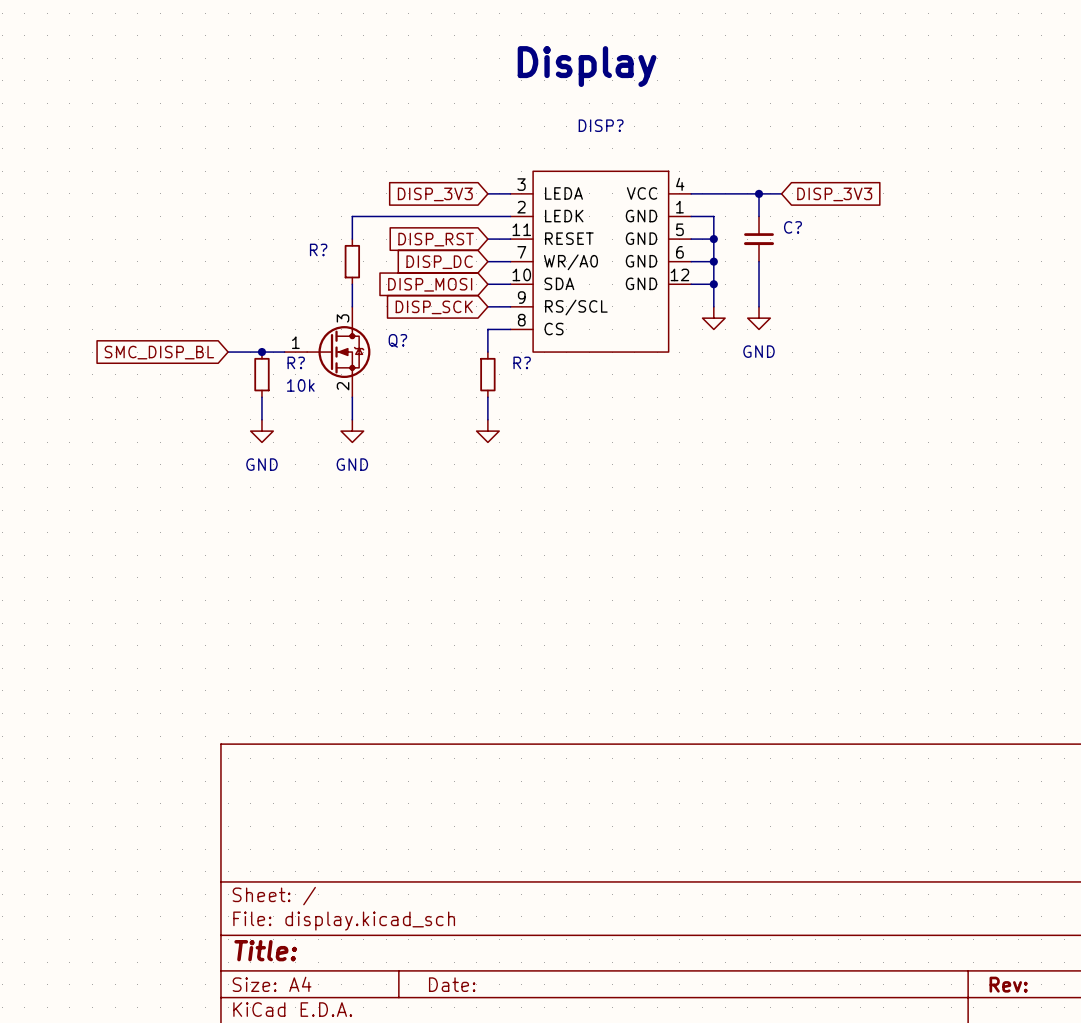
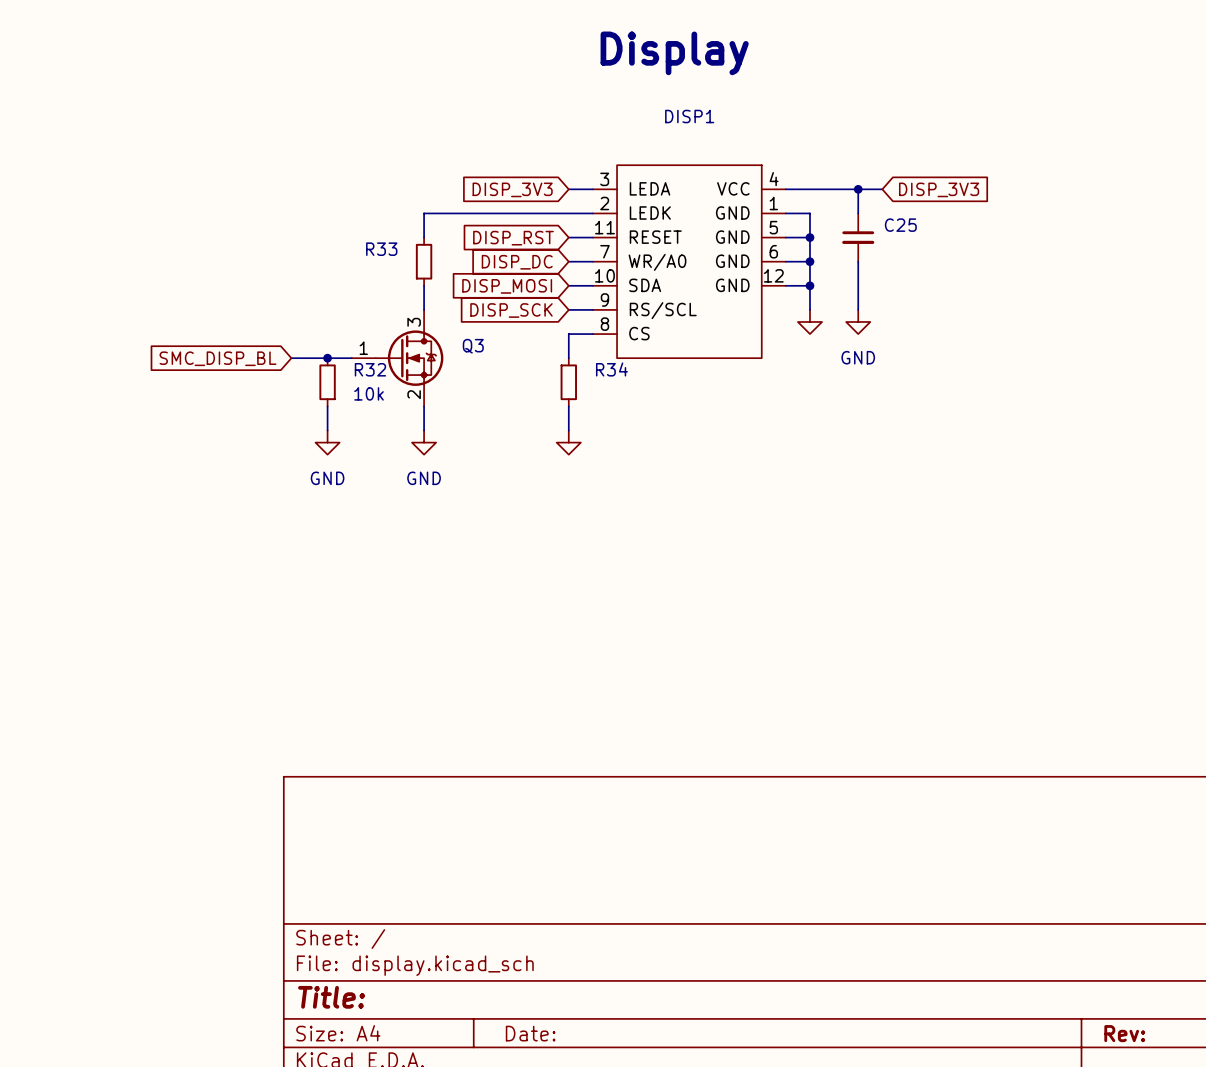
DISP? name: DISP? (601, 125) -> DISP1 (689, 116)
C? name: C? (792, 227) -> C25 (900, 225)
R? name: R? (318, 249) -> R33 (381, 249)
Q? name: Q? (397, 340) -> Q3 (473, 346)
R? name: R? (296, 362) -> R32 (370, 369)
R? name: R? (522, 362) -> R34 (611, 369)

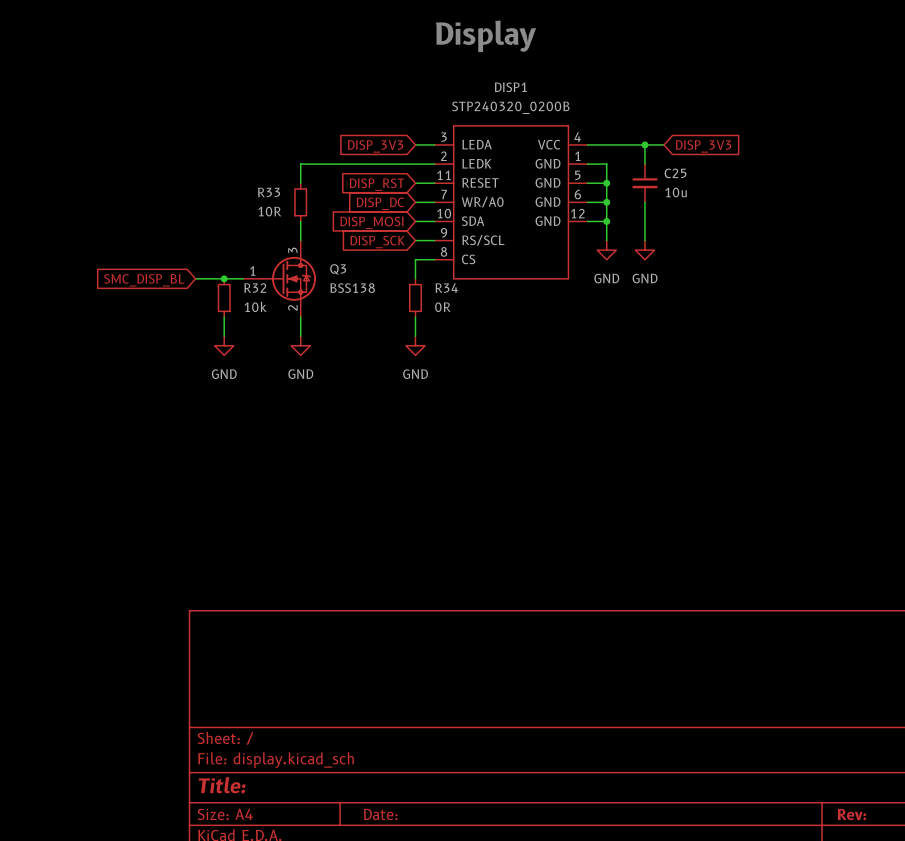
DISP1 value: none -> STP240320_0200B (510, 107)
C25 value: none -> 10u (676, 192)
R33 value: none -> 10R (269, 211)
power symbol text: none -> GND (606, 278)
Q3 value: none -> BSS138 (352, 288)
R34 value: none -> 0R (442, 307)
power symbol text: none -> GND (415, 374)

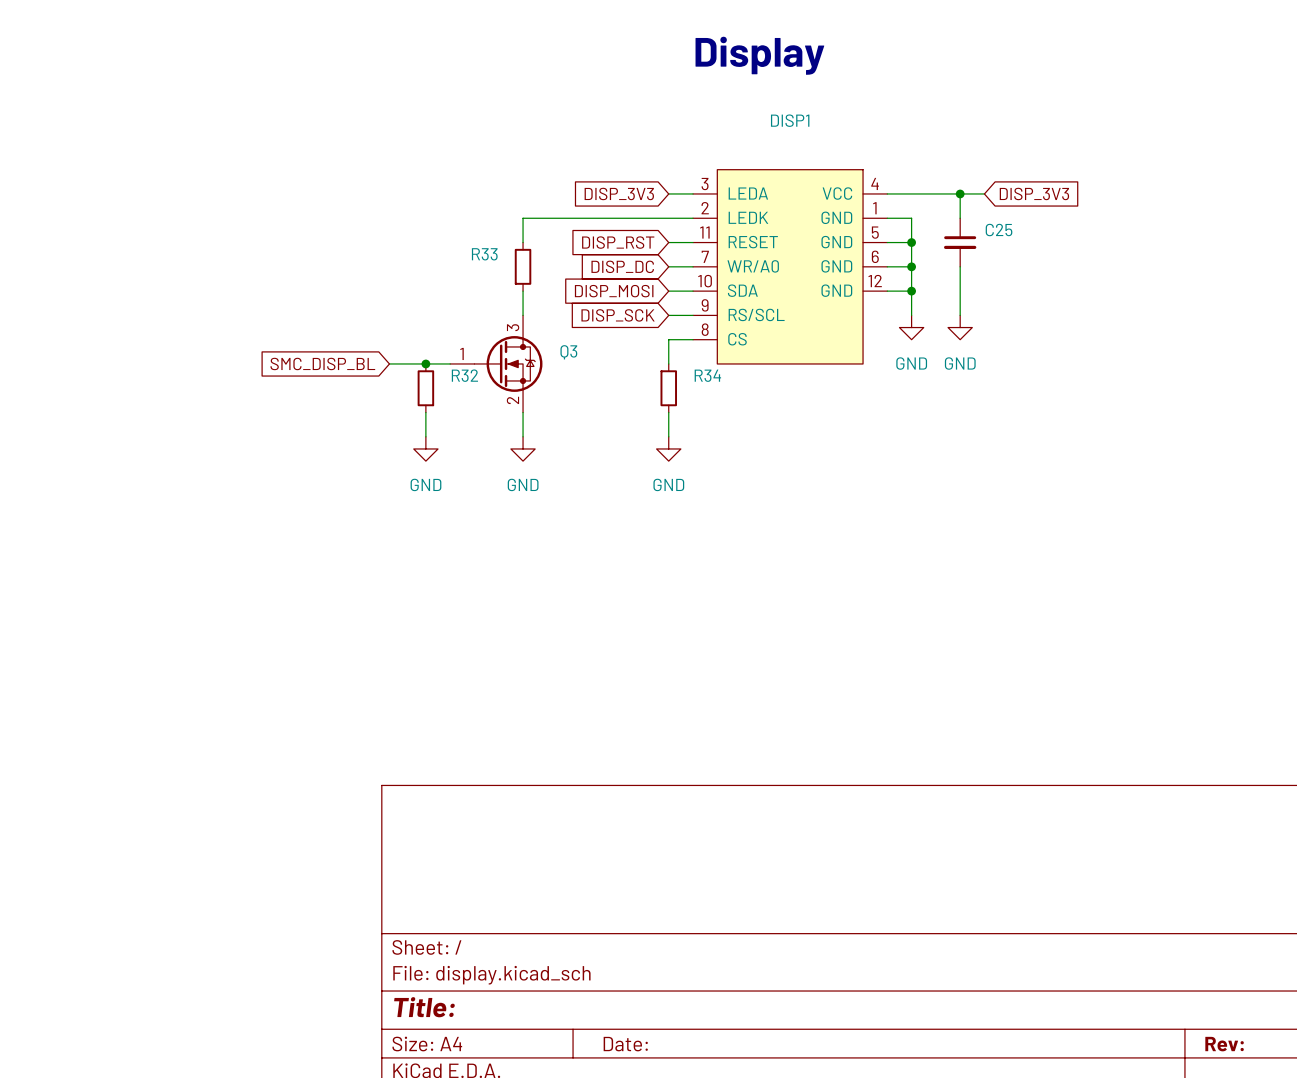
DISP1 value: STP240320_0200B (510, 107) -> none
DISP1 symbol: [434, 125, 588, 279] -> [693, 169, 888, 364]
C25 value: 10u (676, 192) -> none
R33 value: 10R (269, 211) -> none
Q3 value: BSS138 (352, 288) -> none
R32 value: 10k (255, 306) -> none
R34 value: 0R (442, 307) -> none

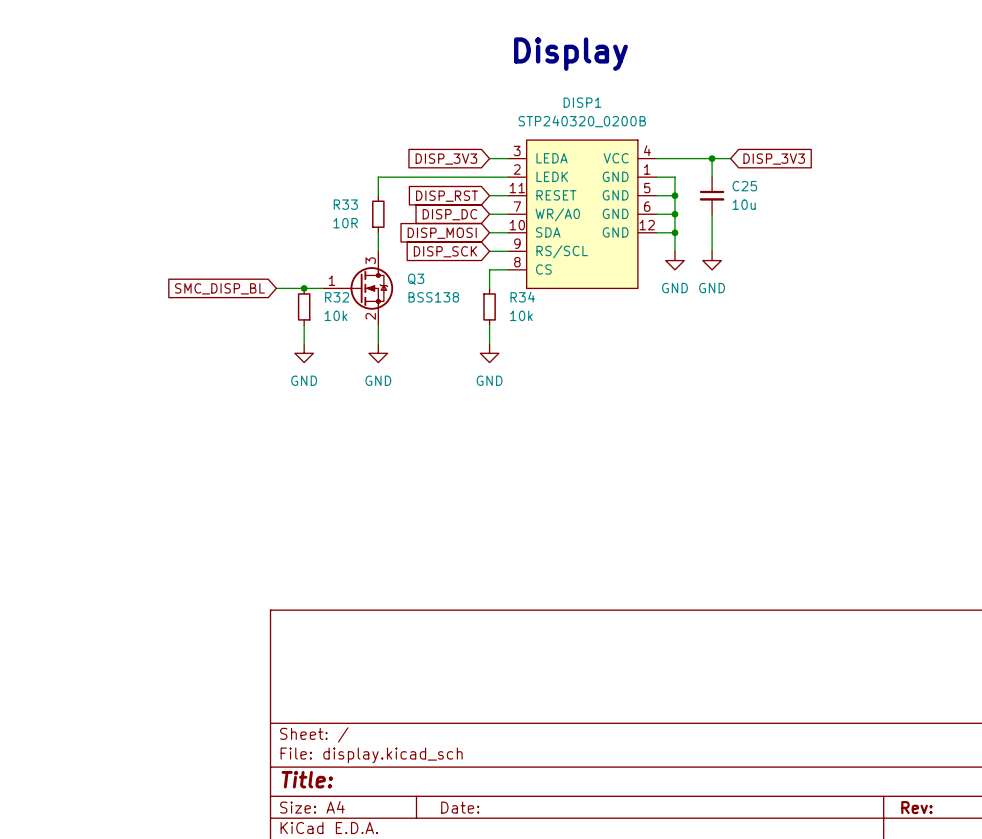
DISP1 value: none -> STP240320_0200B (582, 121)
C25 value: none -> 10u (744, 204)
R33 value: none -> 10R (345, 223)
Q3 value: none -> BSS138 (433, 297)
R32 value: none -> 10k (336, 315)
R34 value: none -> 10k (521, 315)

